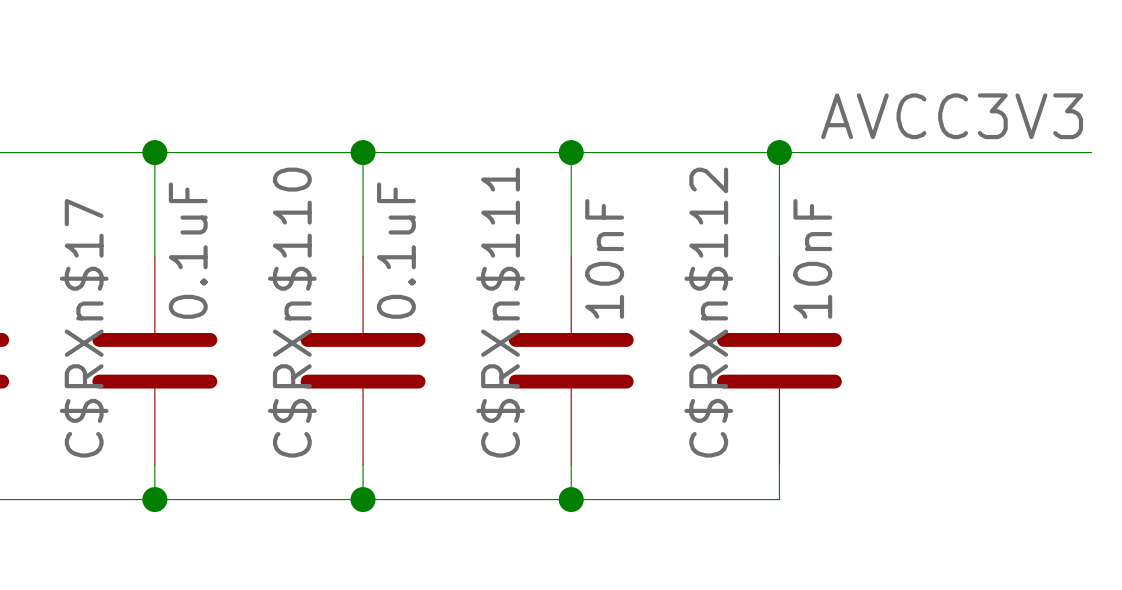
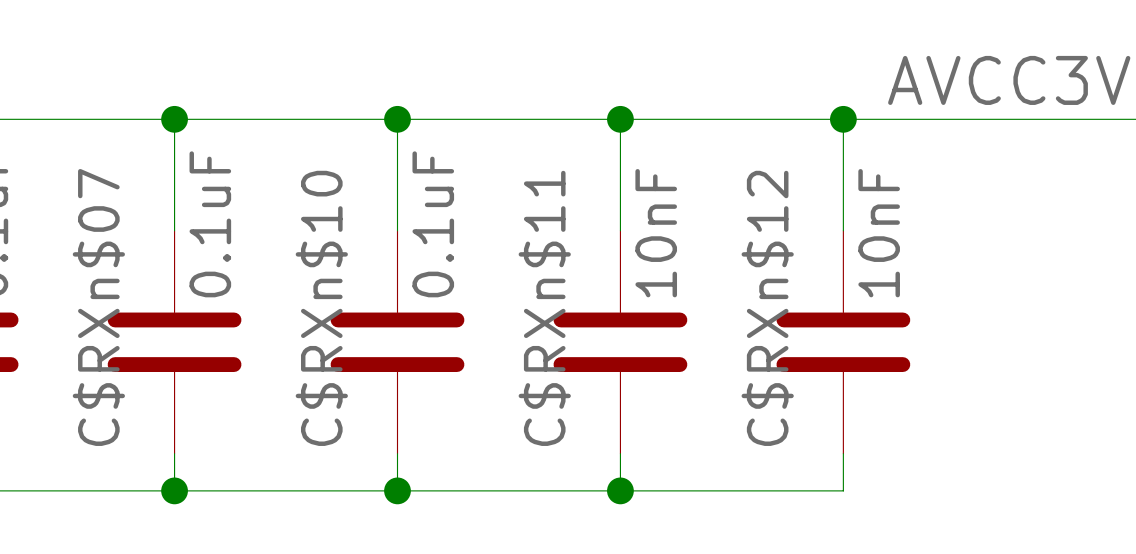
C$RXn$110 name: C$RXn$110 (292, 312) -> C$RXn$10 (321, 308)
C$RXn$111 name: C$RXn$111 (500, 312) -> C$RXn$11 (544, 308)
C$RXn$112 name: C$RXn$112 (708, 312) -> C$RXn$12 (767, 308)
C$RXn$17 name: C$RXn$17 (84, 328) -> C$RXn$07 (98, 307)

